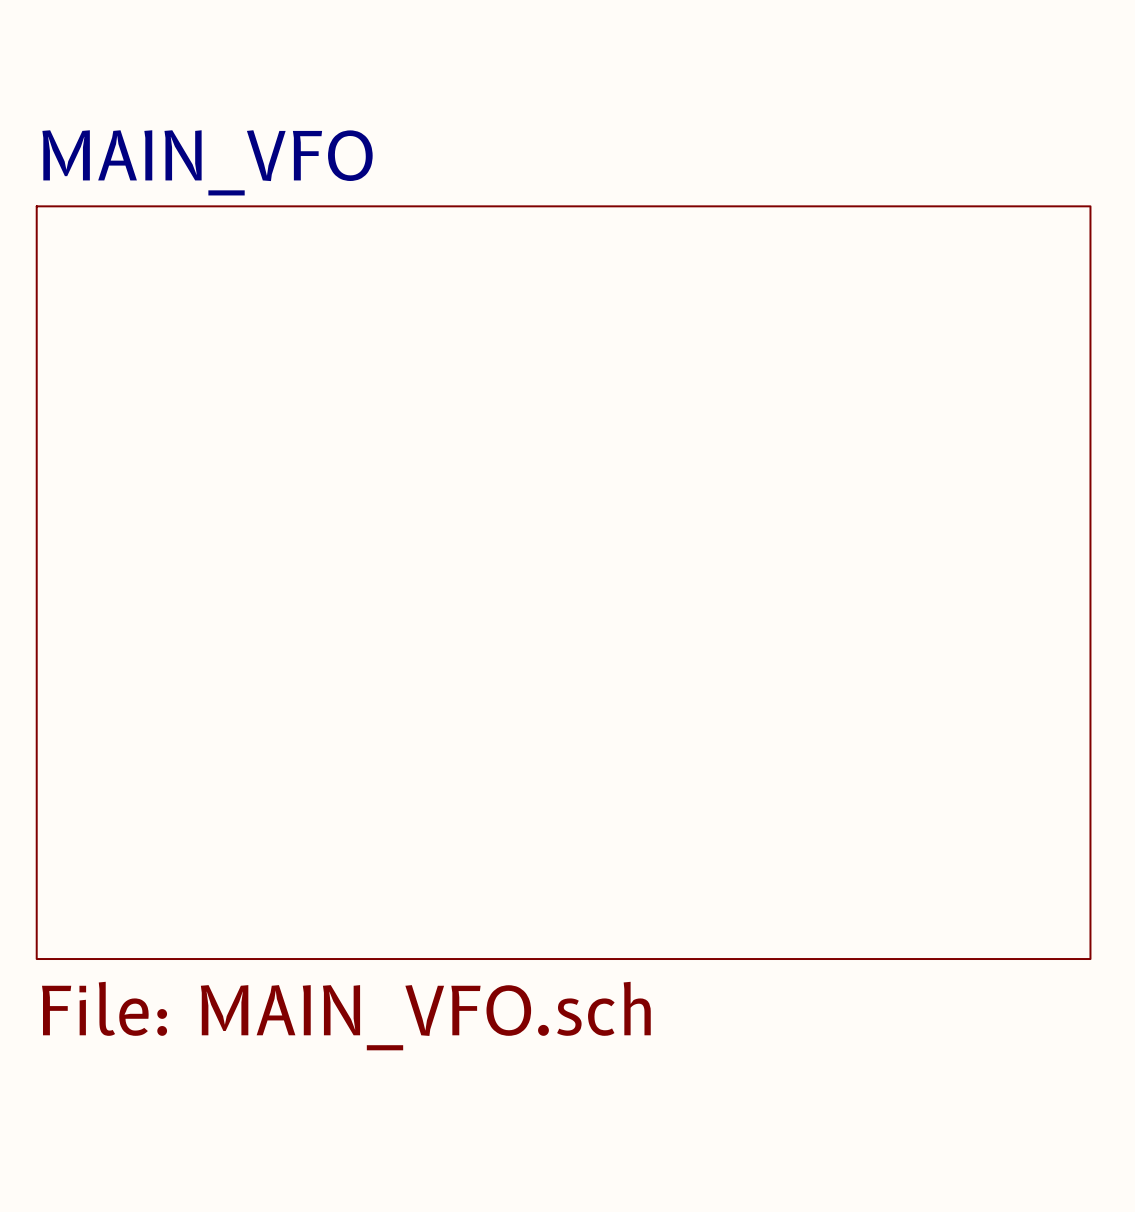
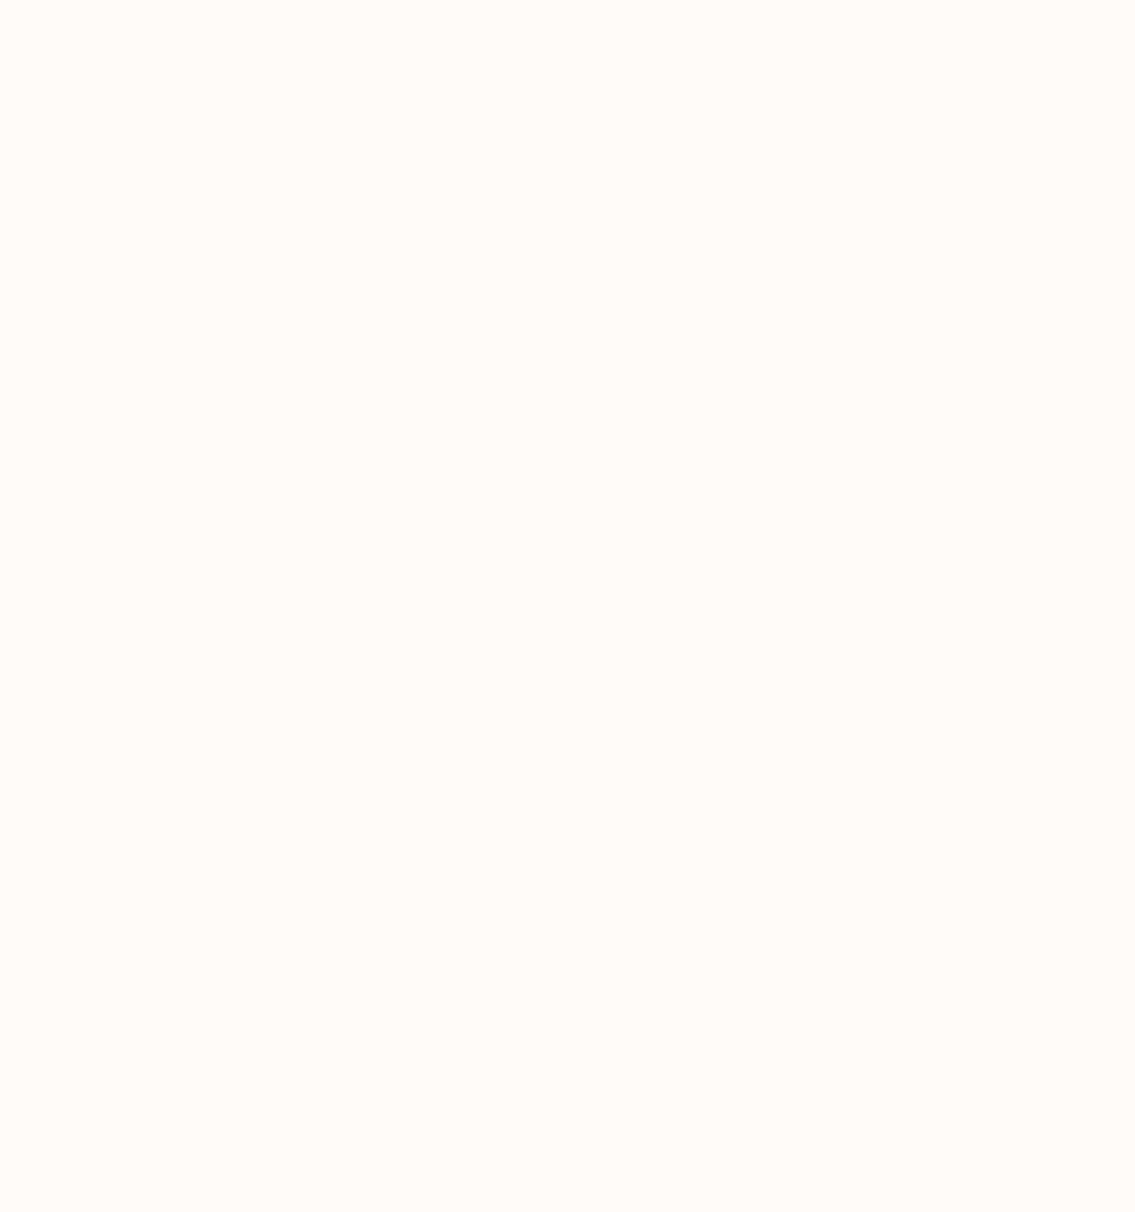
sheet MAIN_VFO: File: MAIN_VFO.sch (563, 582) -> none

